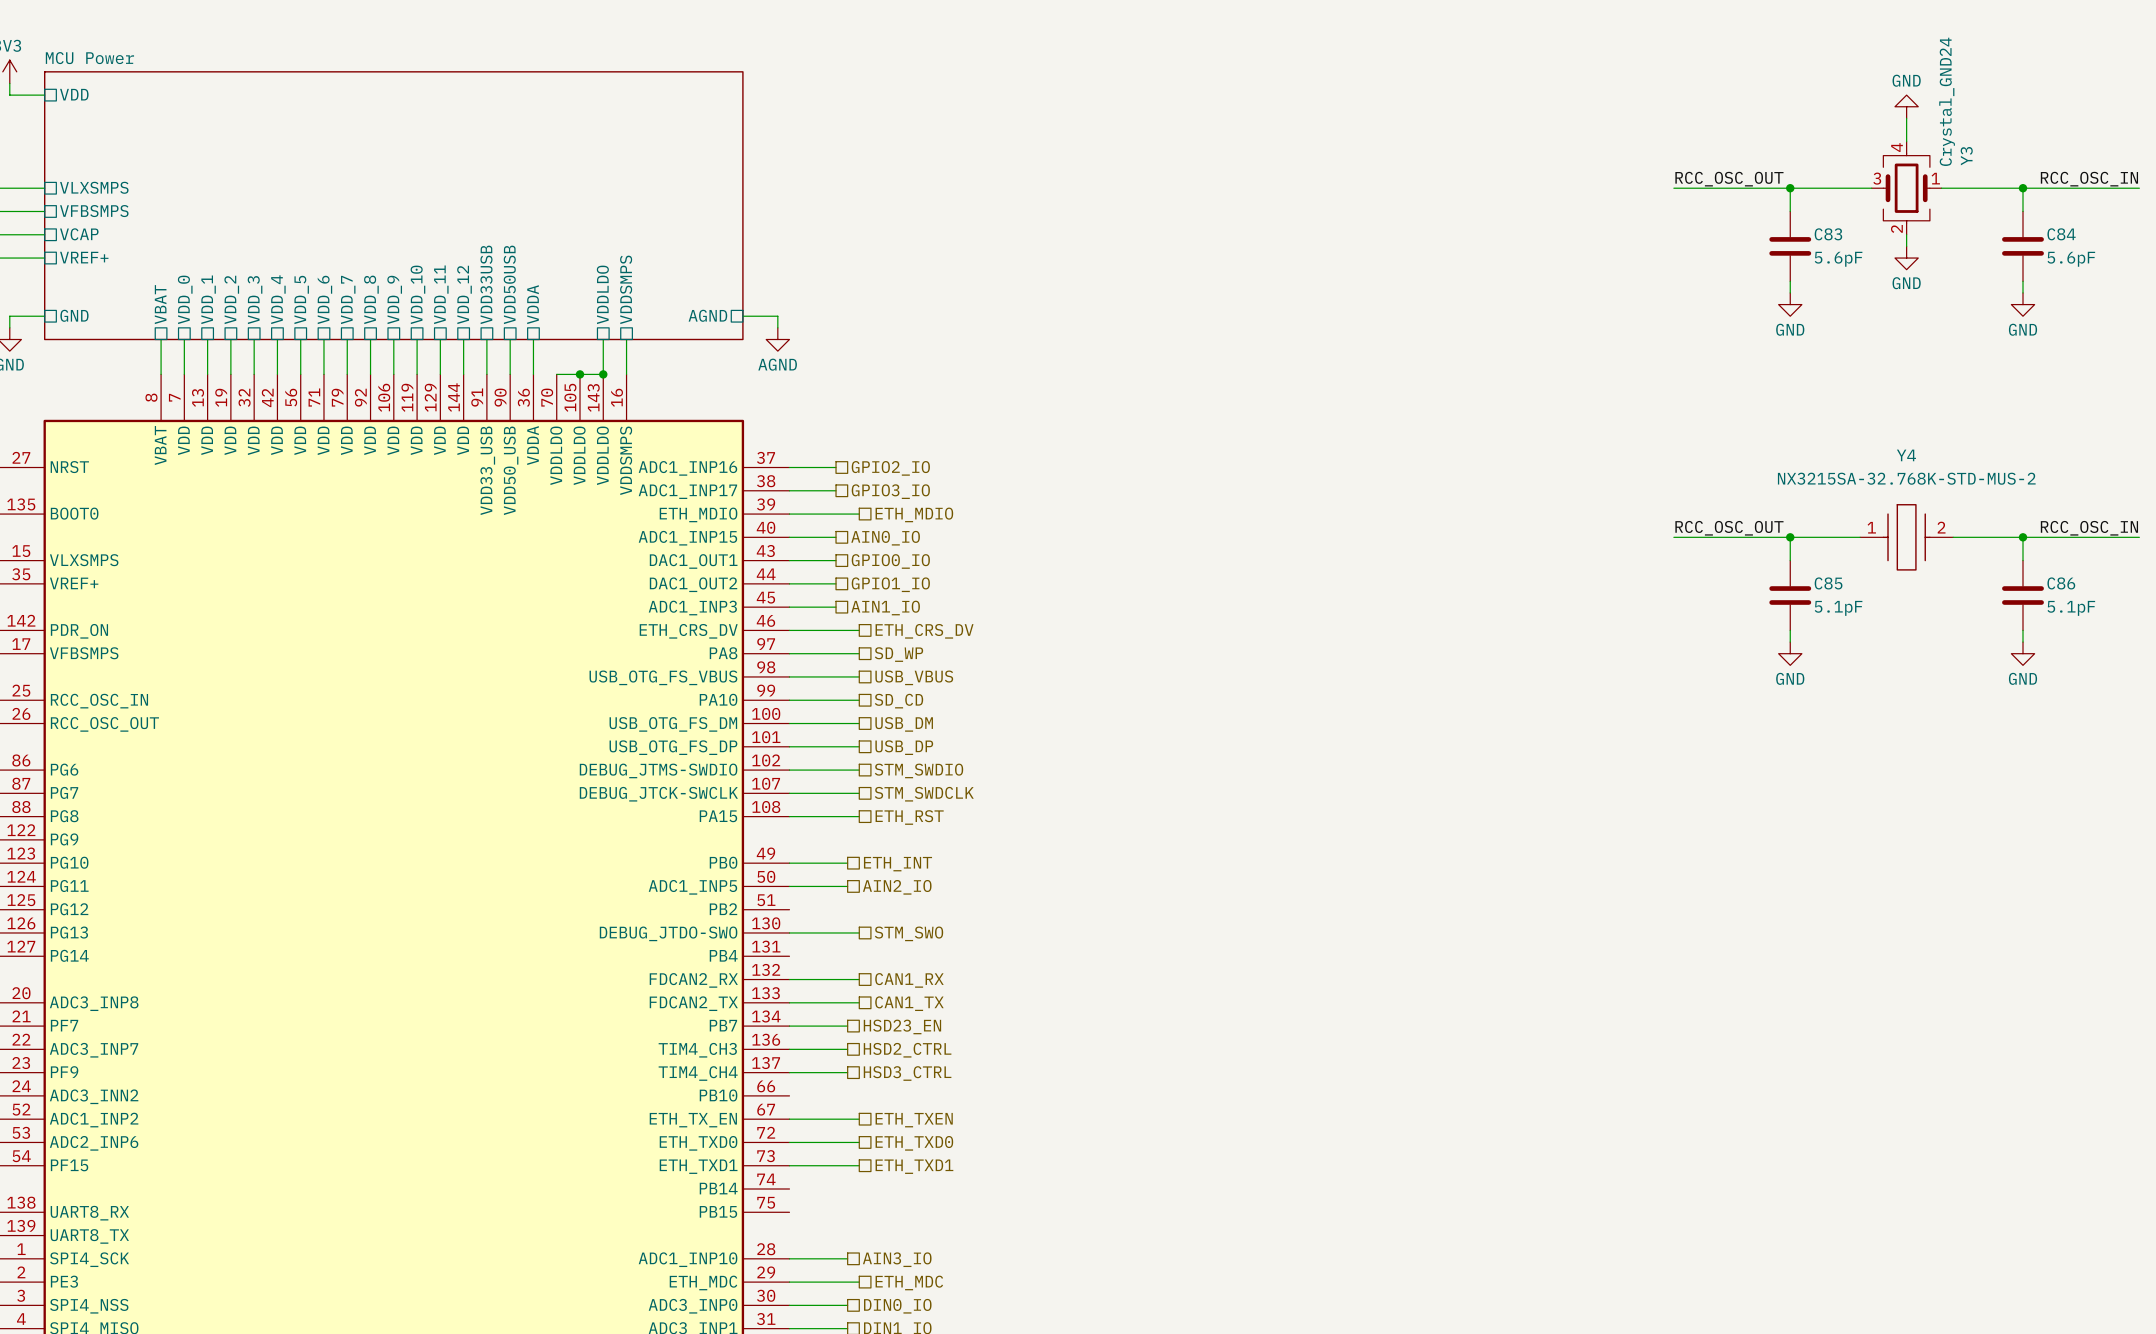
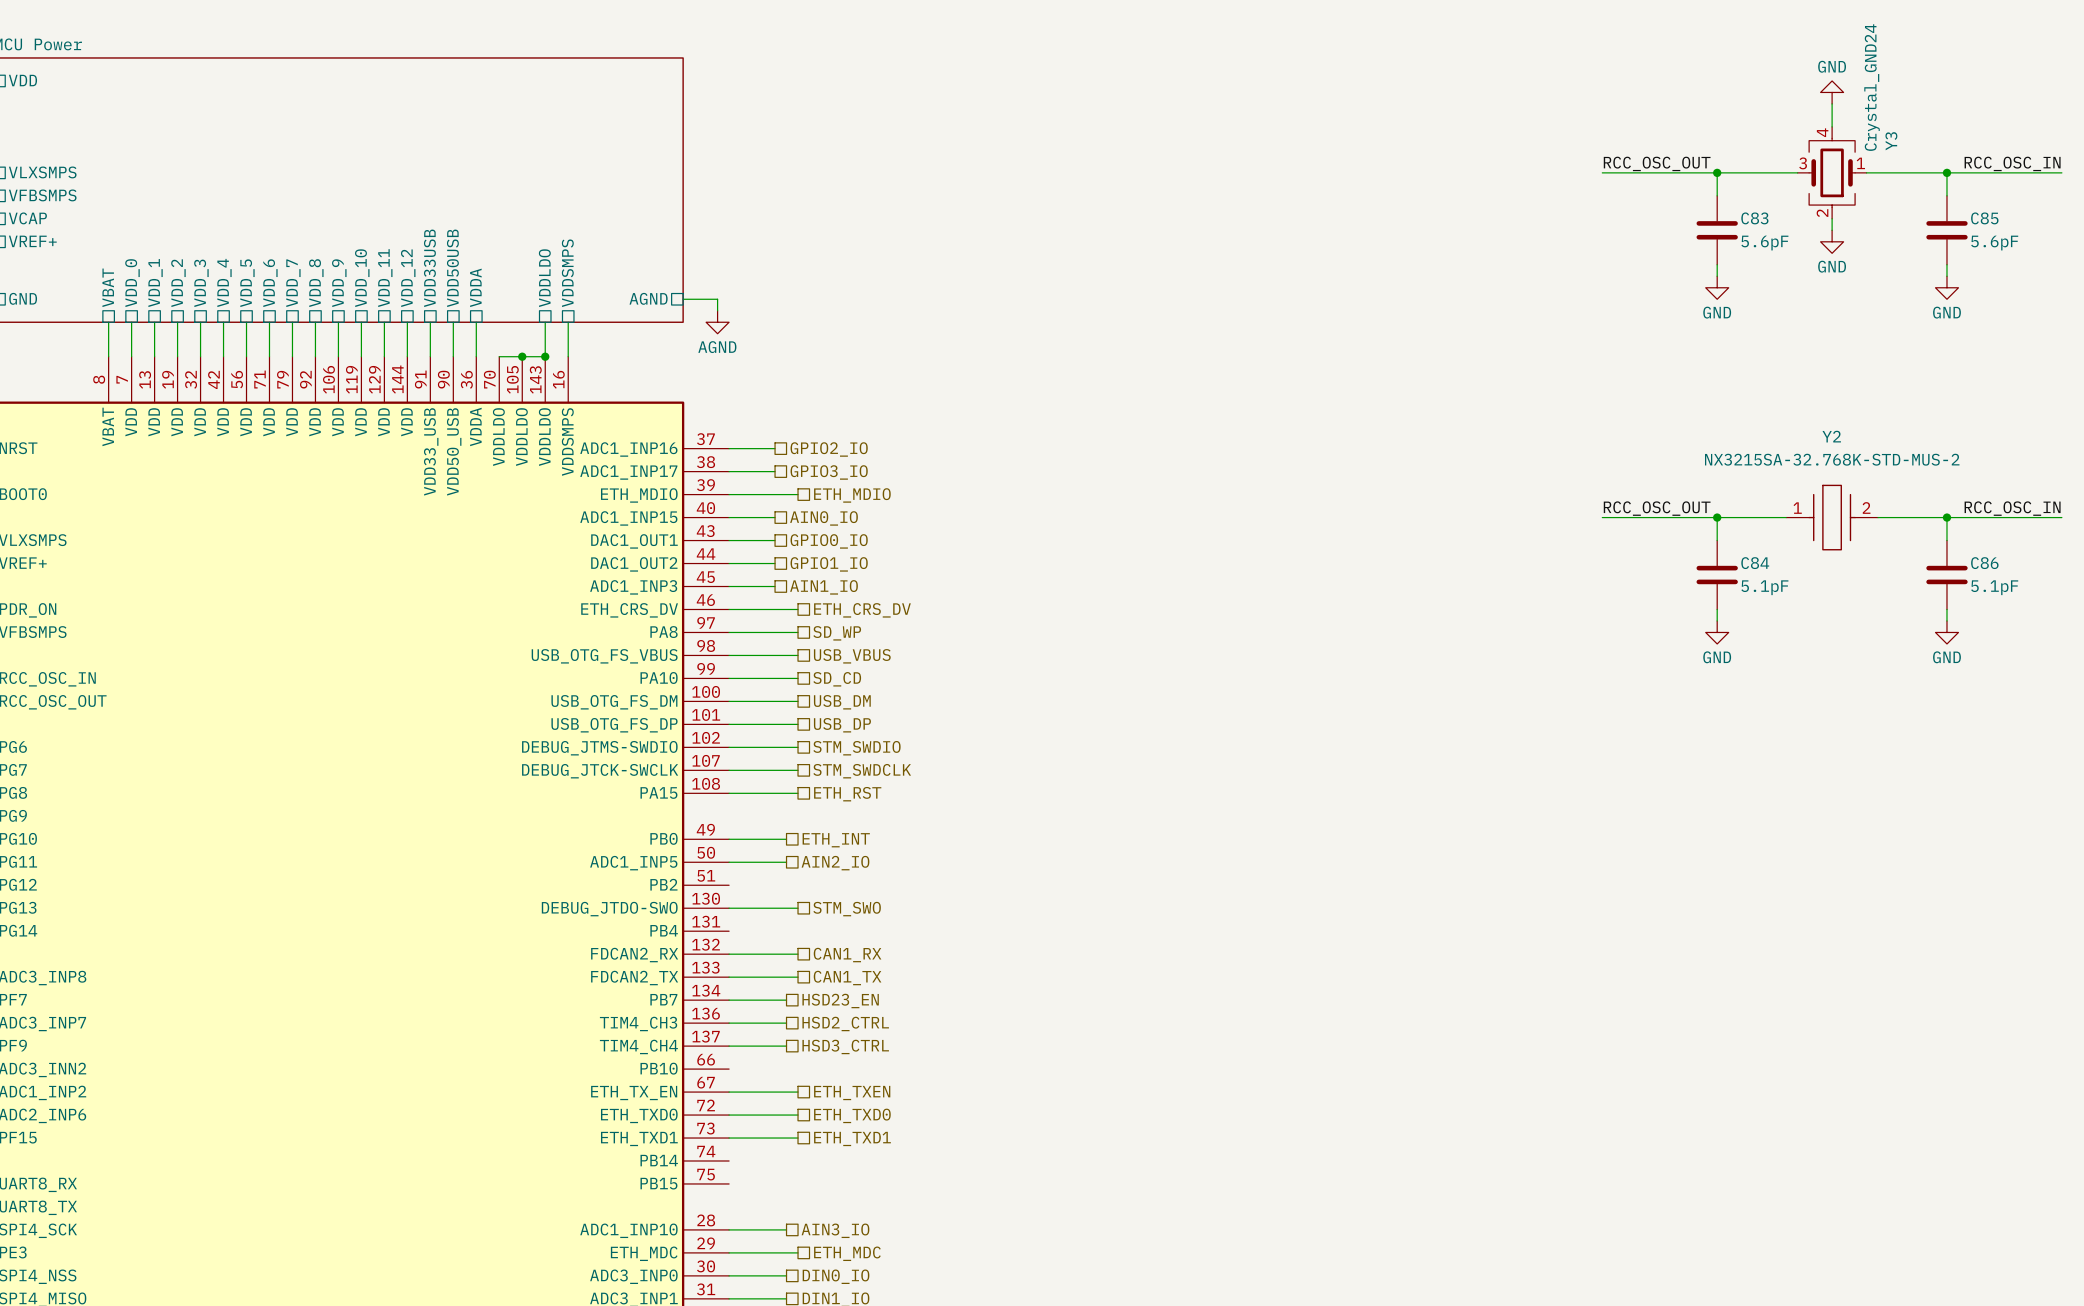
C84 name: C84 (2061, 234) -> C85 (1984, 218)
Y4 name: Y4 (1906, 455) -> Y2 (1831, 436)
C85 name: C85 (1828, 583) -> C84 (1755, 563)

